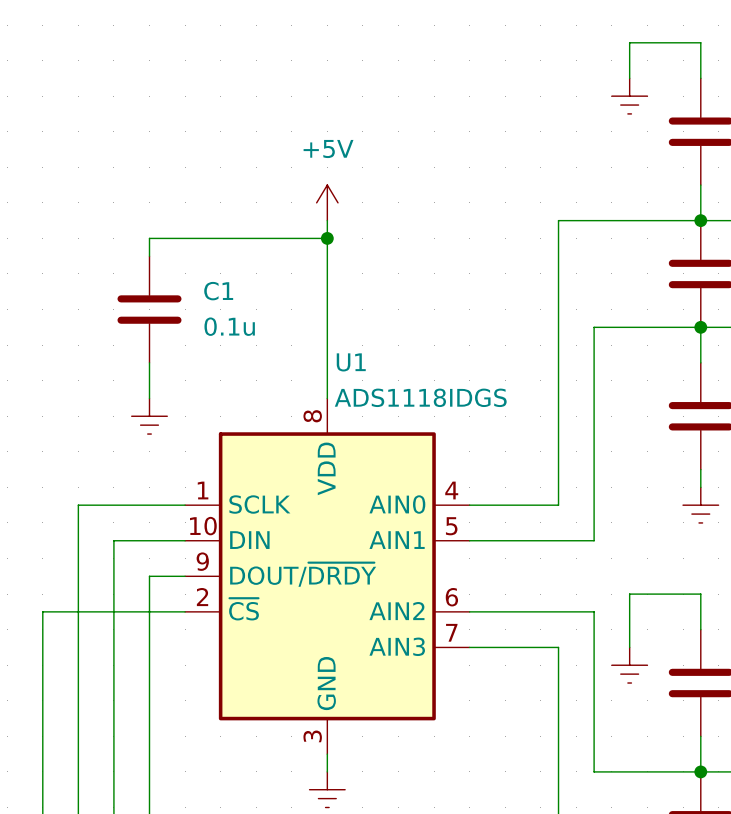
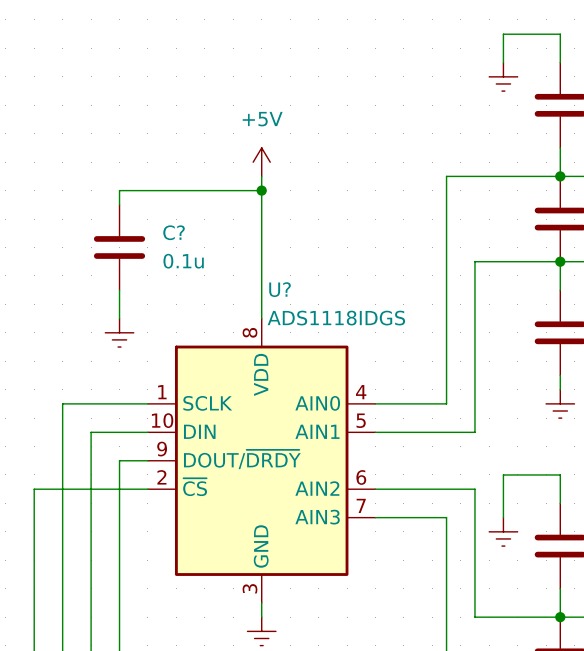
C1 name: C1 (218, 291) -> C? (174, 232)
U1 name: U1 (351, 362) -> U? (280, 289)

